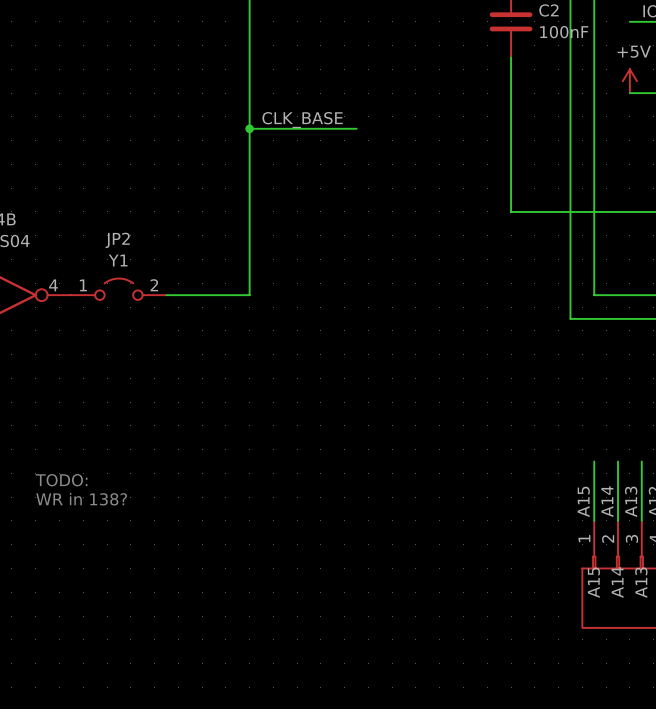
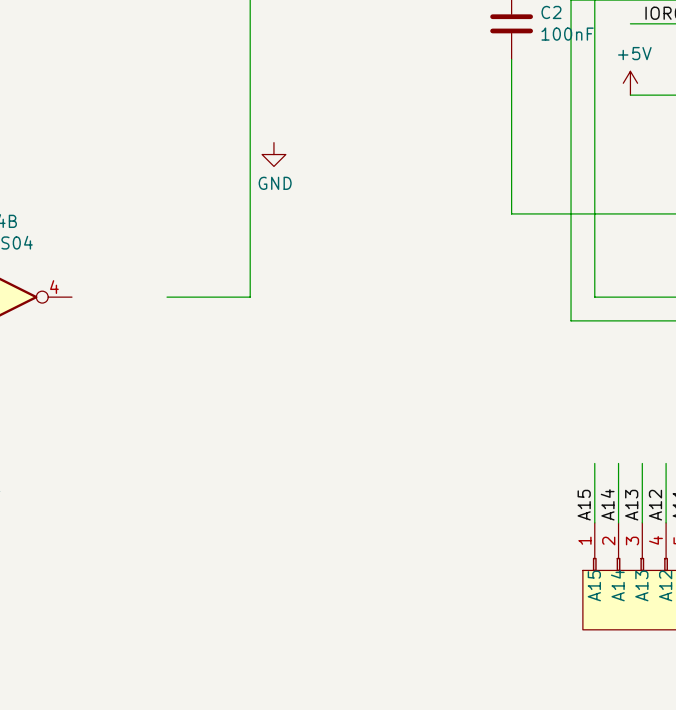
label: CLK_BASE (302, 120) -> none
wire: (249, 128) (356, 128) -> none
junction: (249, 128) -> none
power symbol: none -> GND (273, 154)
JP2: Y1 (118, 289) -> none
text: TODO: (61, 480) -> none
text: WR in 138? (81, 499) -> none

